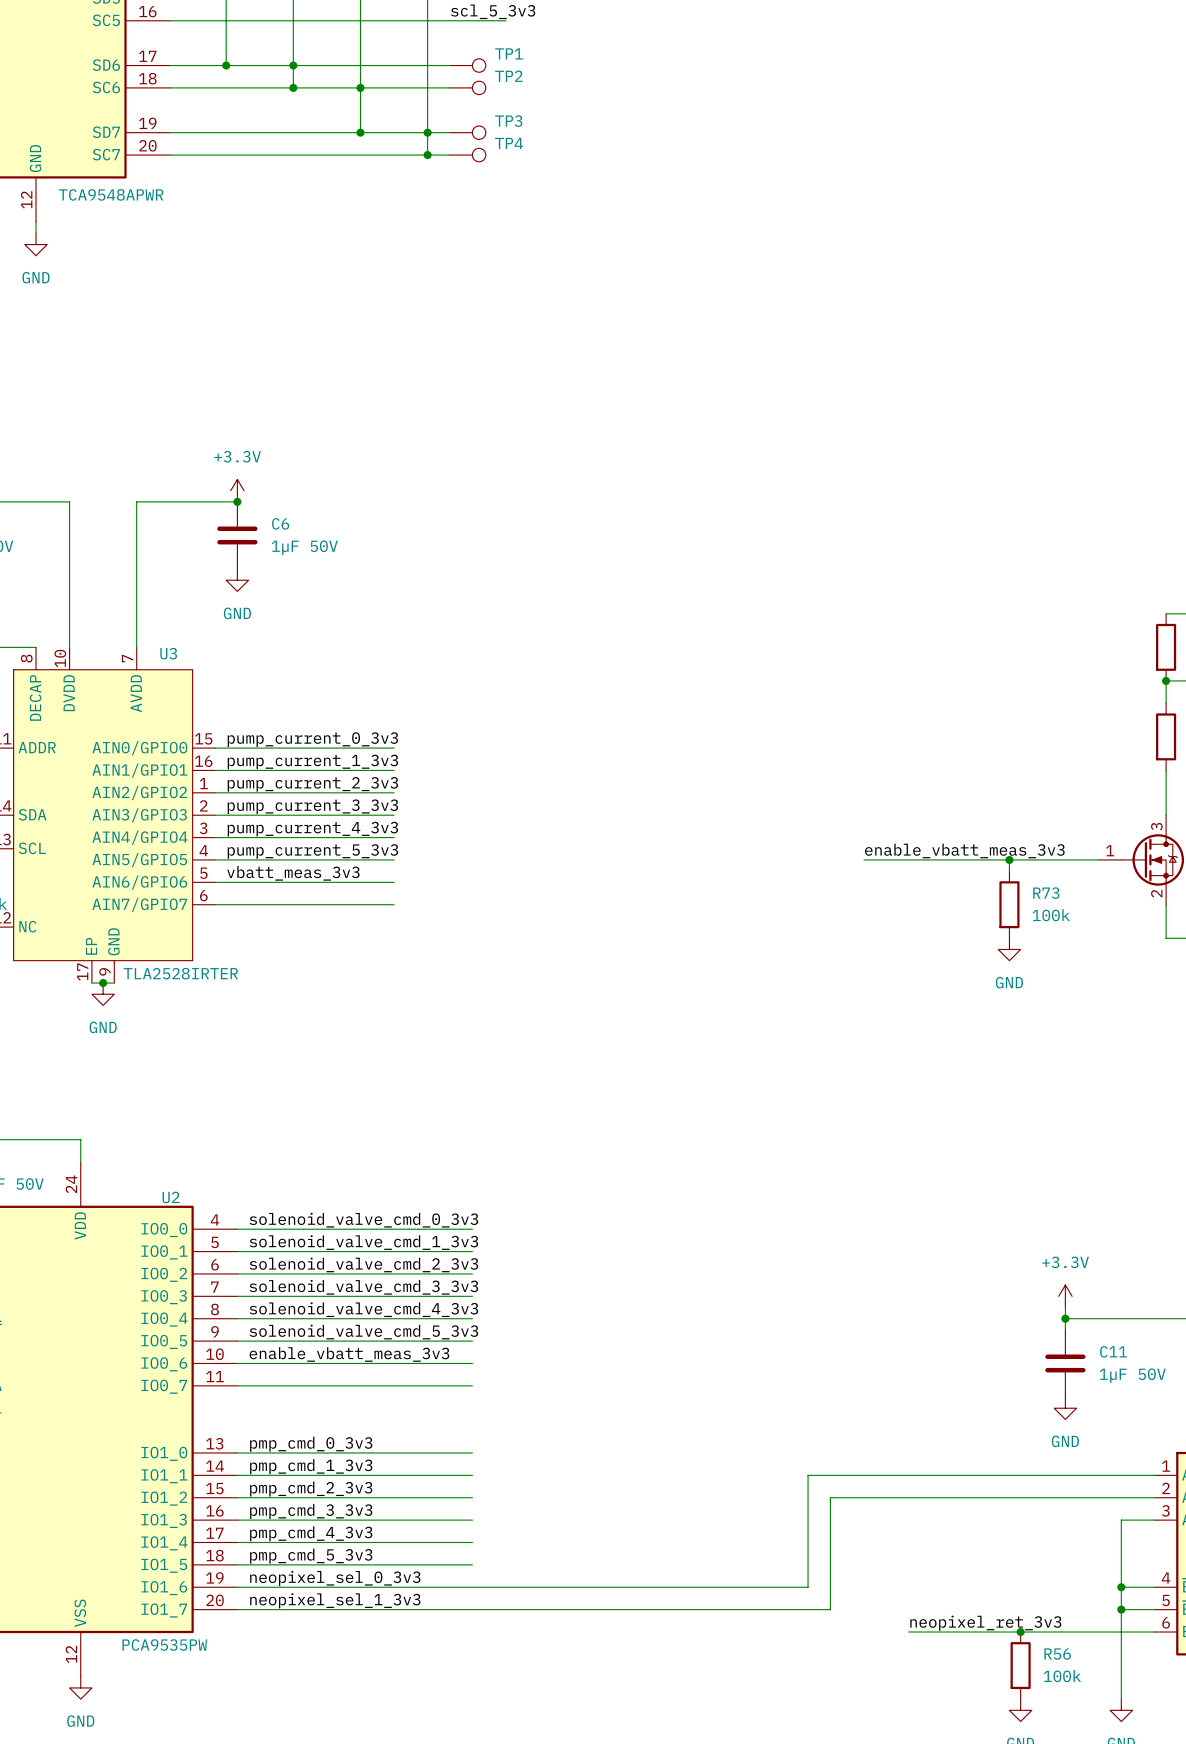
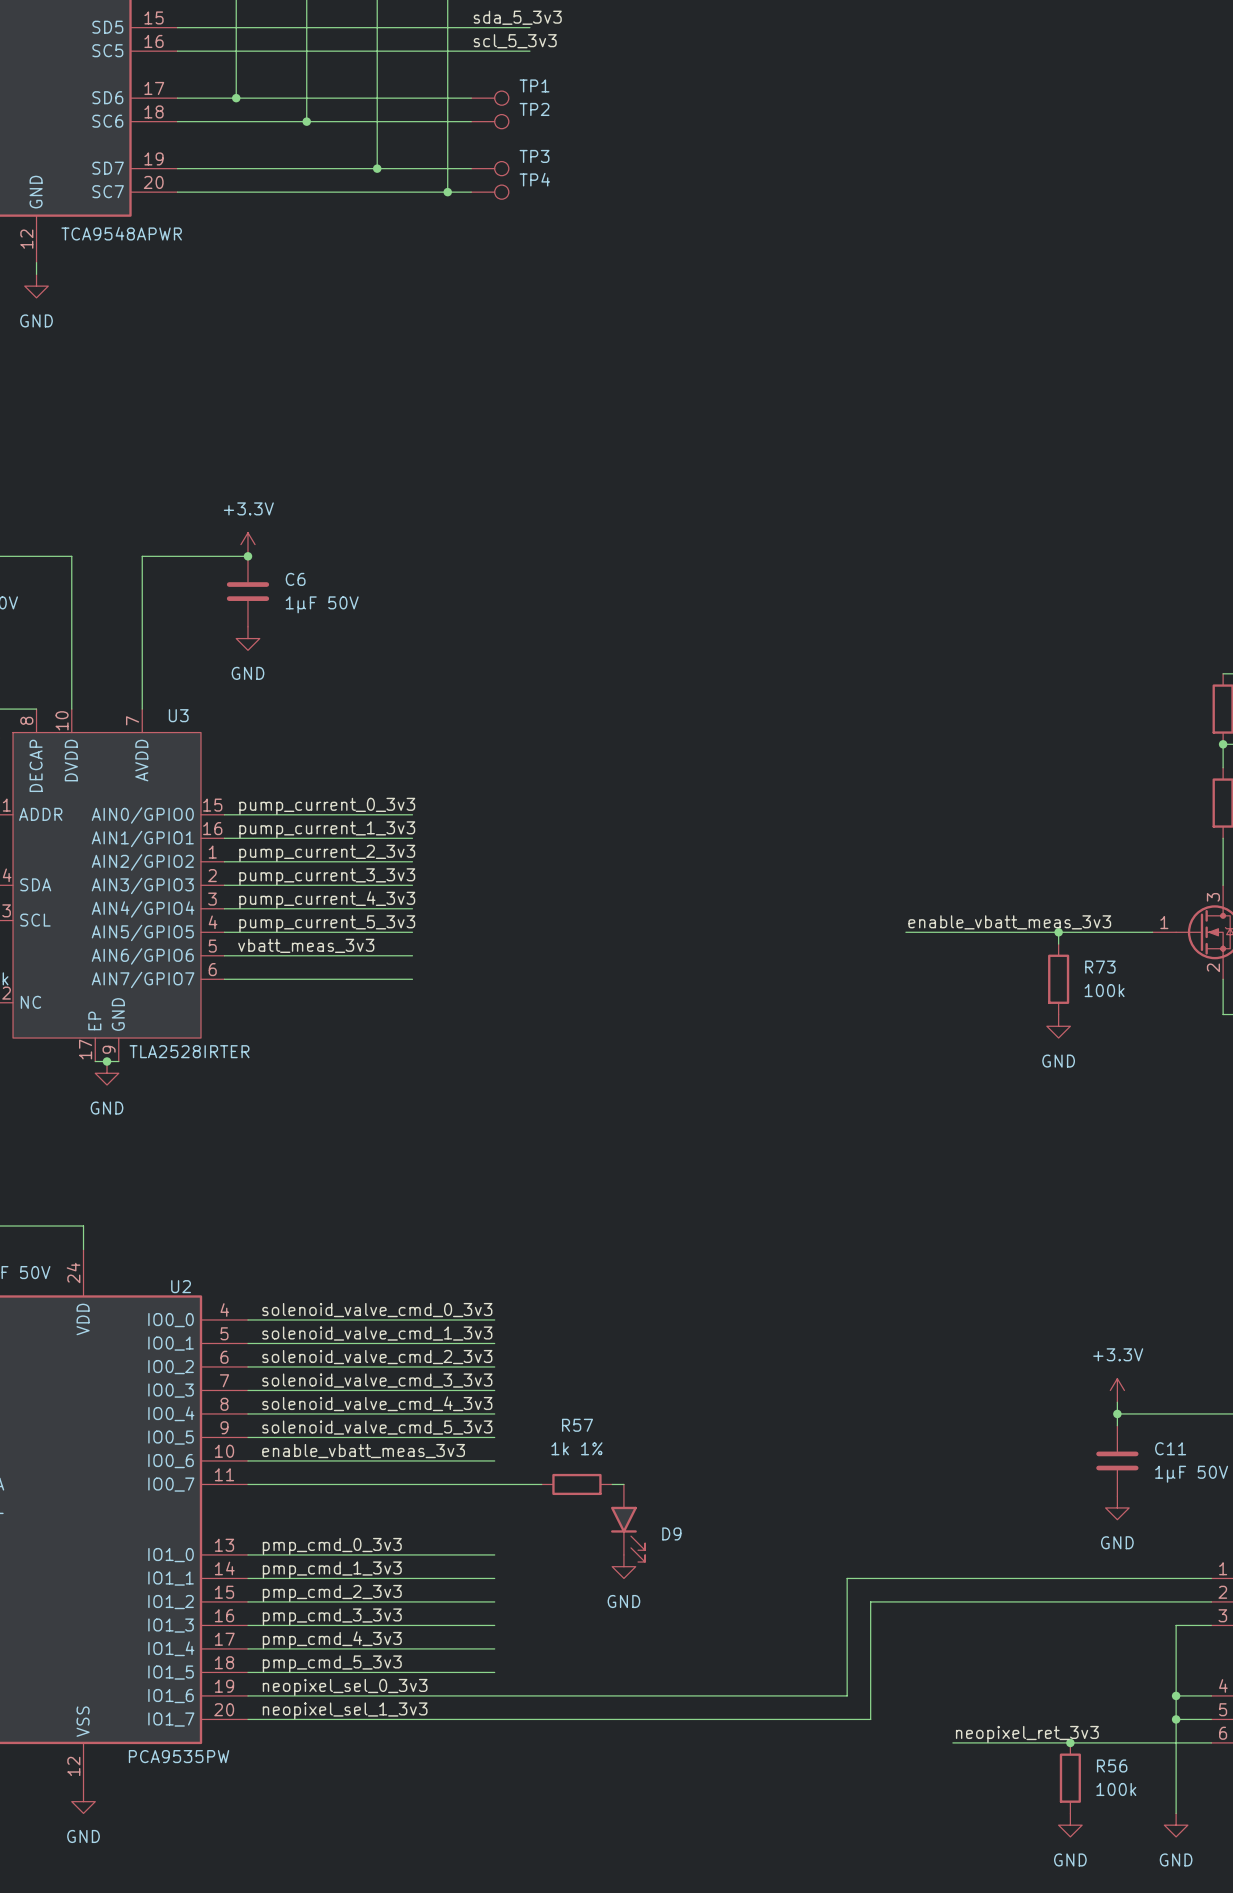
junction: (293, 65) -> none
junction: (360, 87) -> none
junction: (427, 132) -> none
wire: none -> (494, 1484) (541, 1484)
R57: none -> 1k 1% (576, 1484)
wire: none -> (612, 1484) (623, 1484)
D9: none -> (628, 1523)
power symbol: none -> GND (623, 1566)

